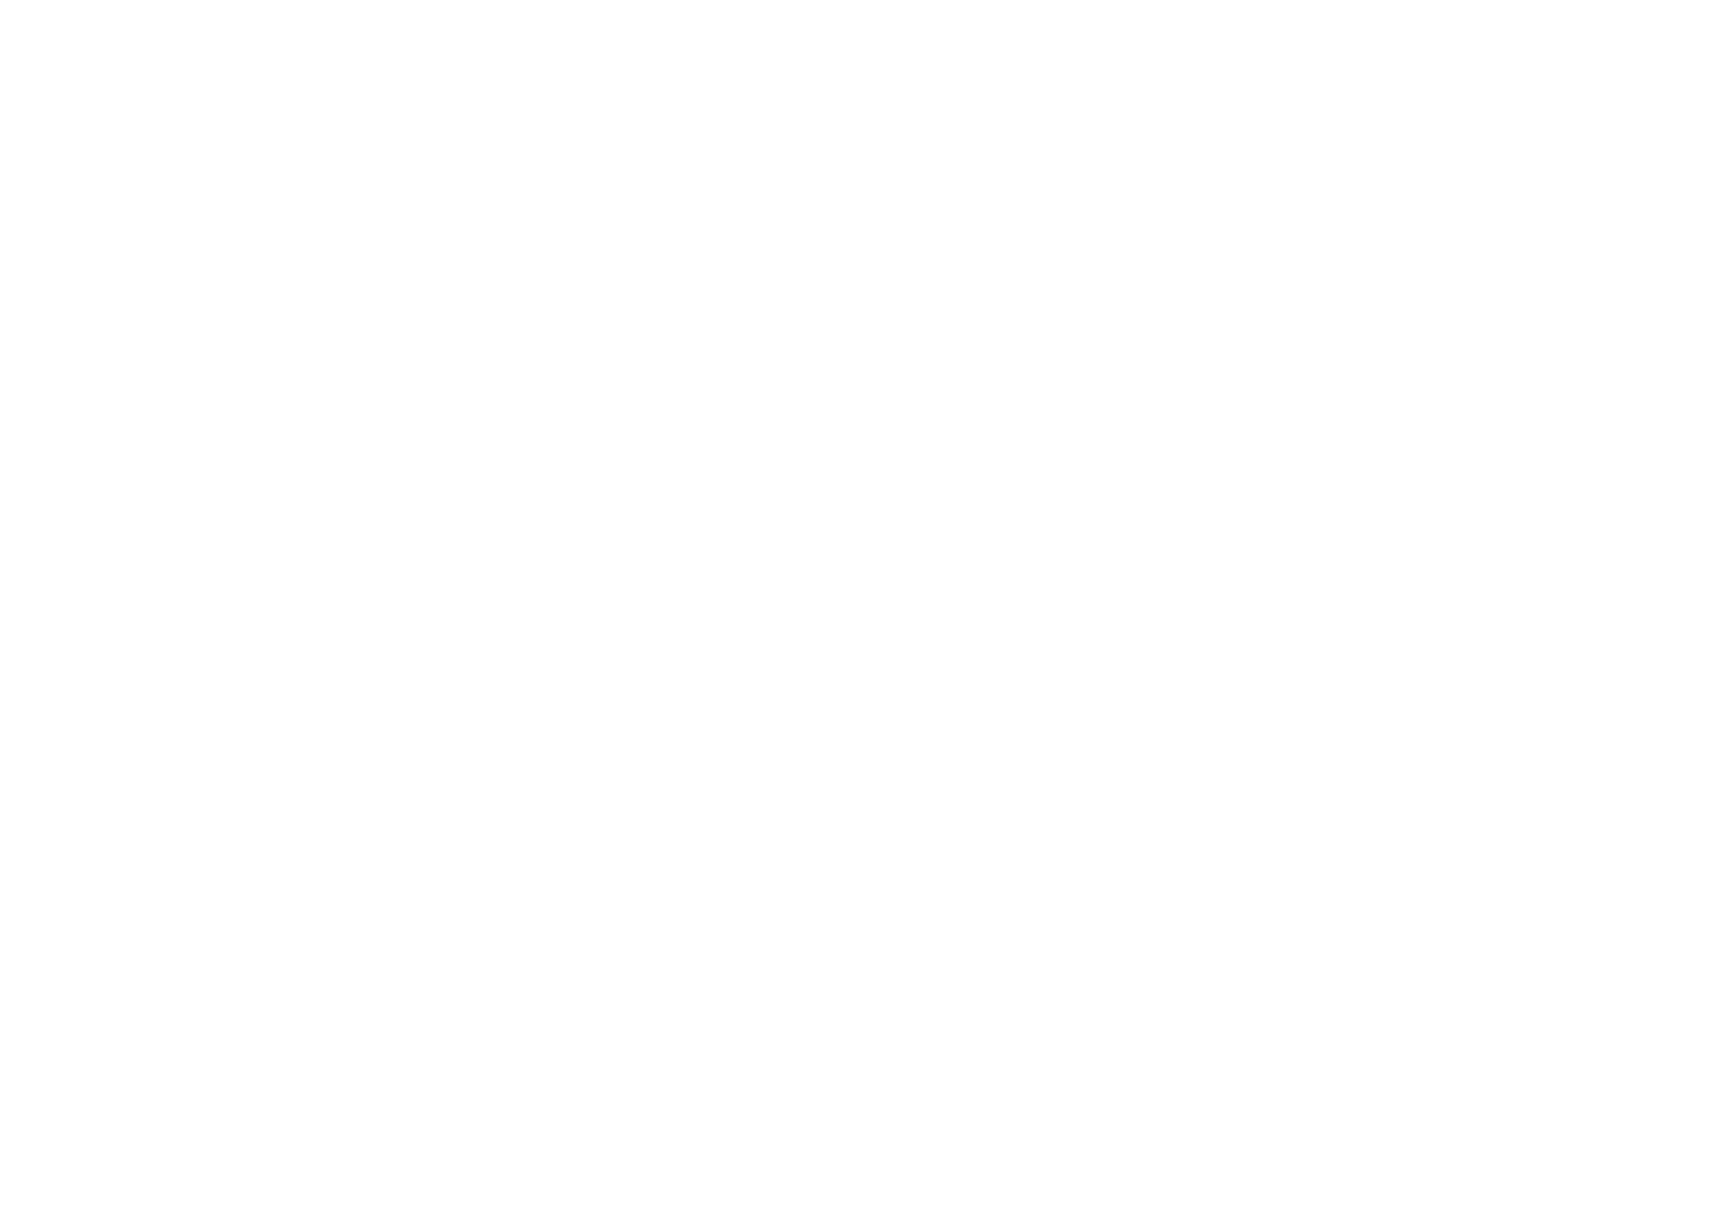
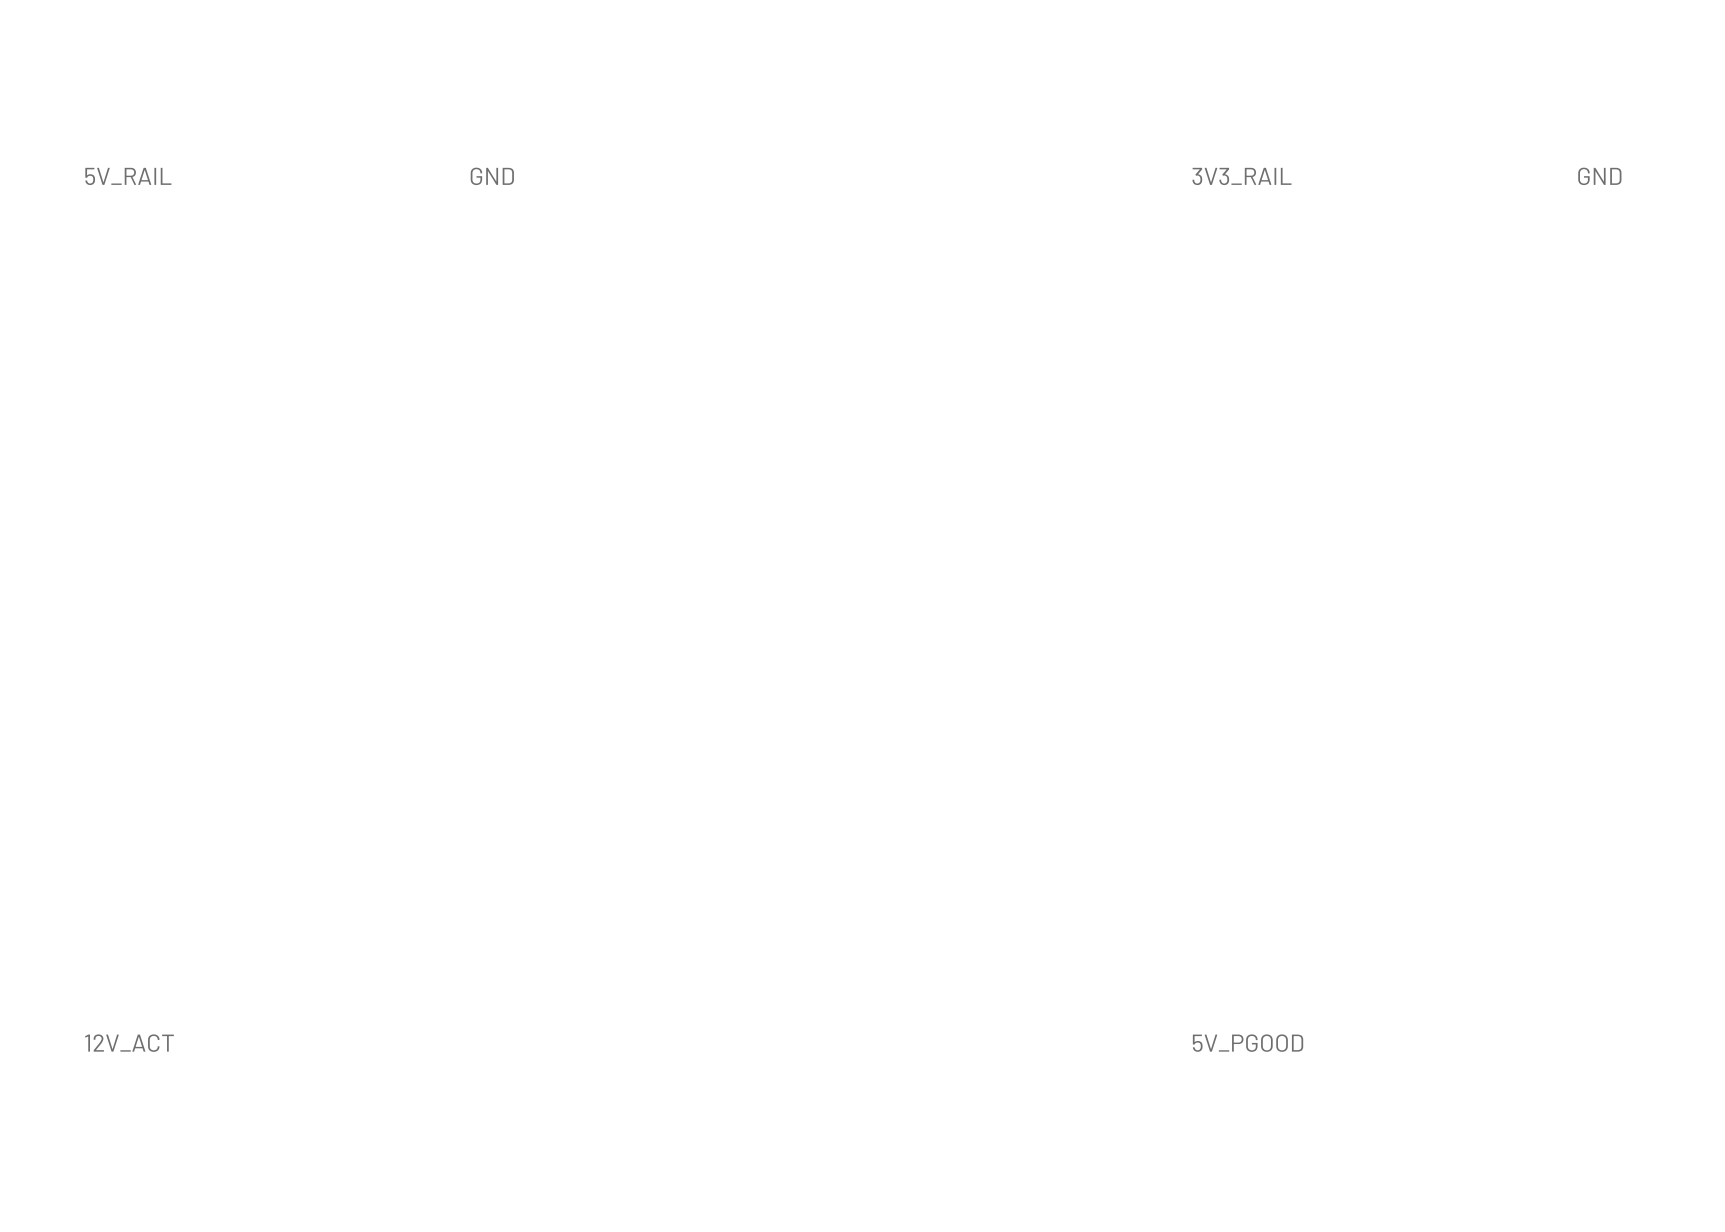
label: none -> 5V_RAIL (128, 176)
label: none -> GND (492, 176)
label: none -> 3V3_RAIL (1241, 176)
label: none -> GND (1599, 176)
label: none -> 12V_ACT (129, 1043)
label: none -> 5V_PGOOD (1248, 1043)

